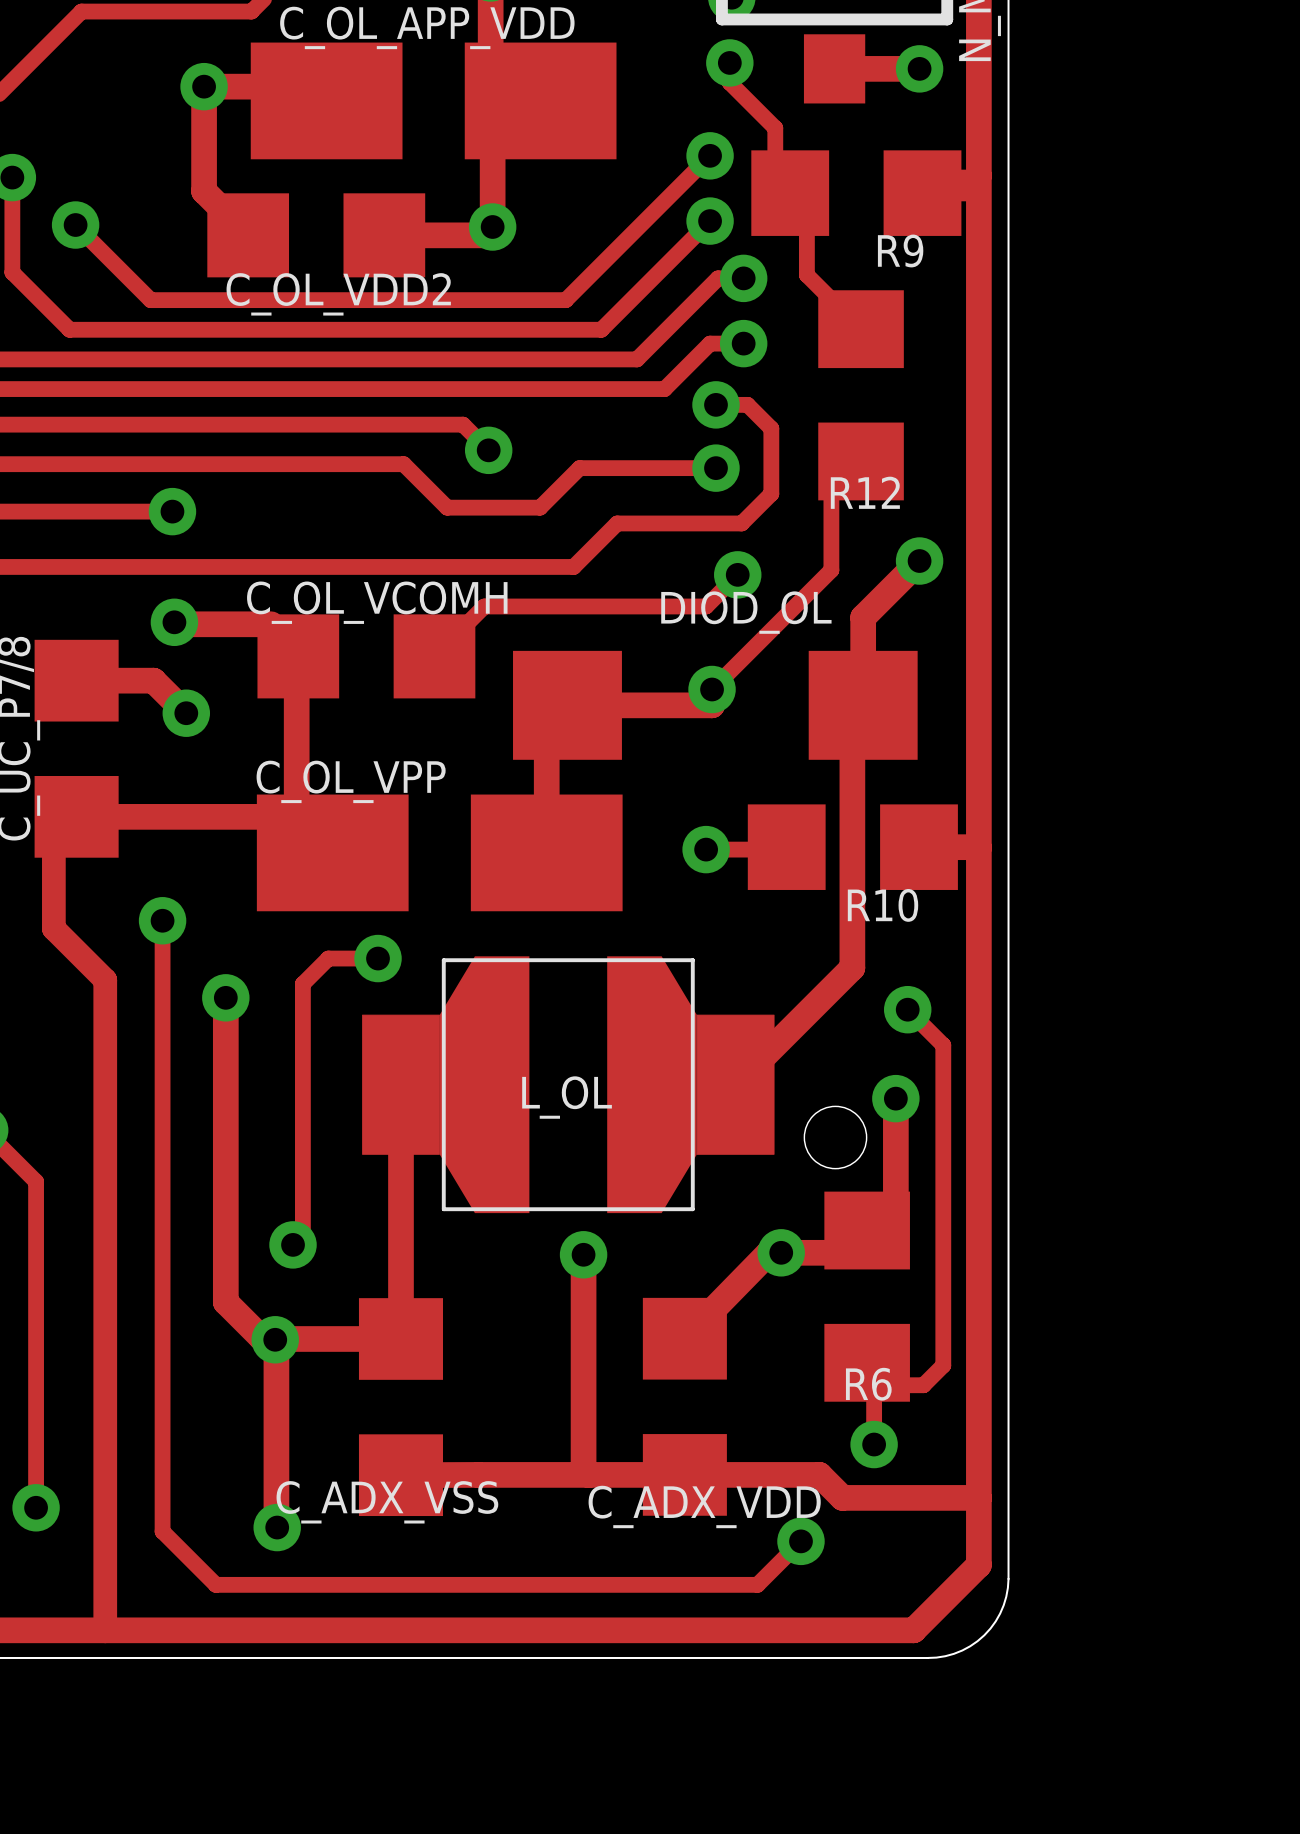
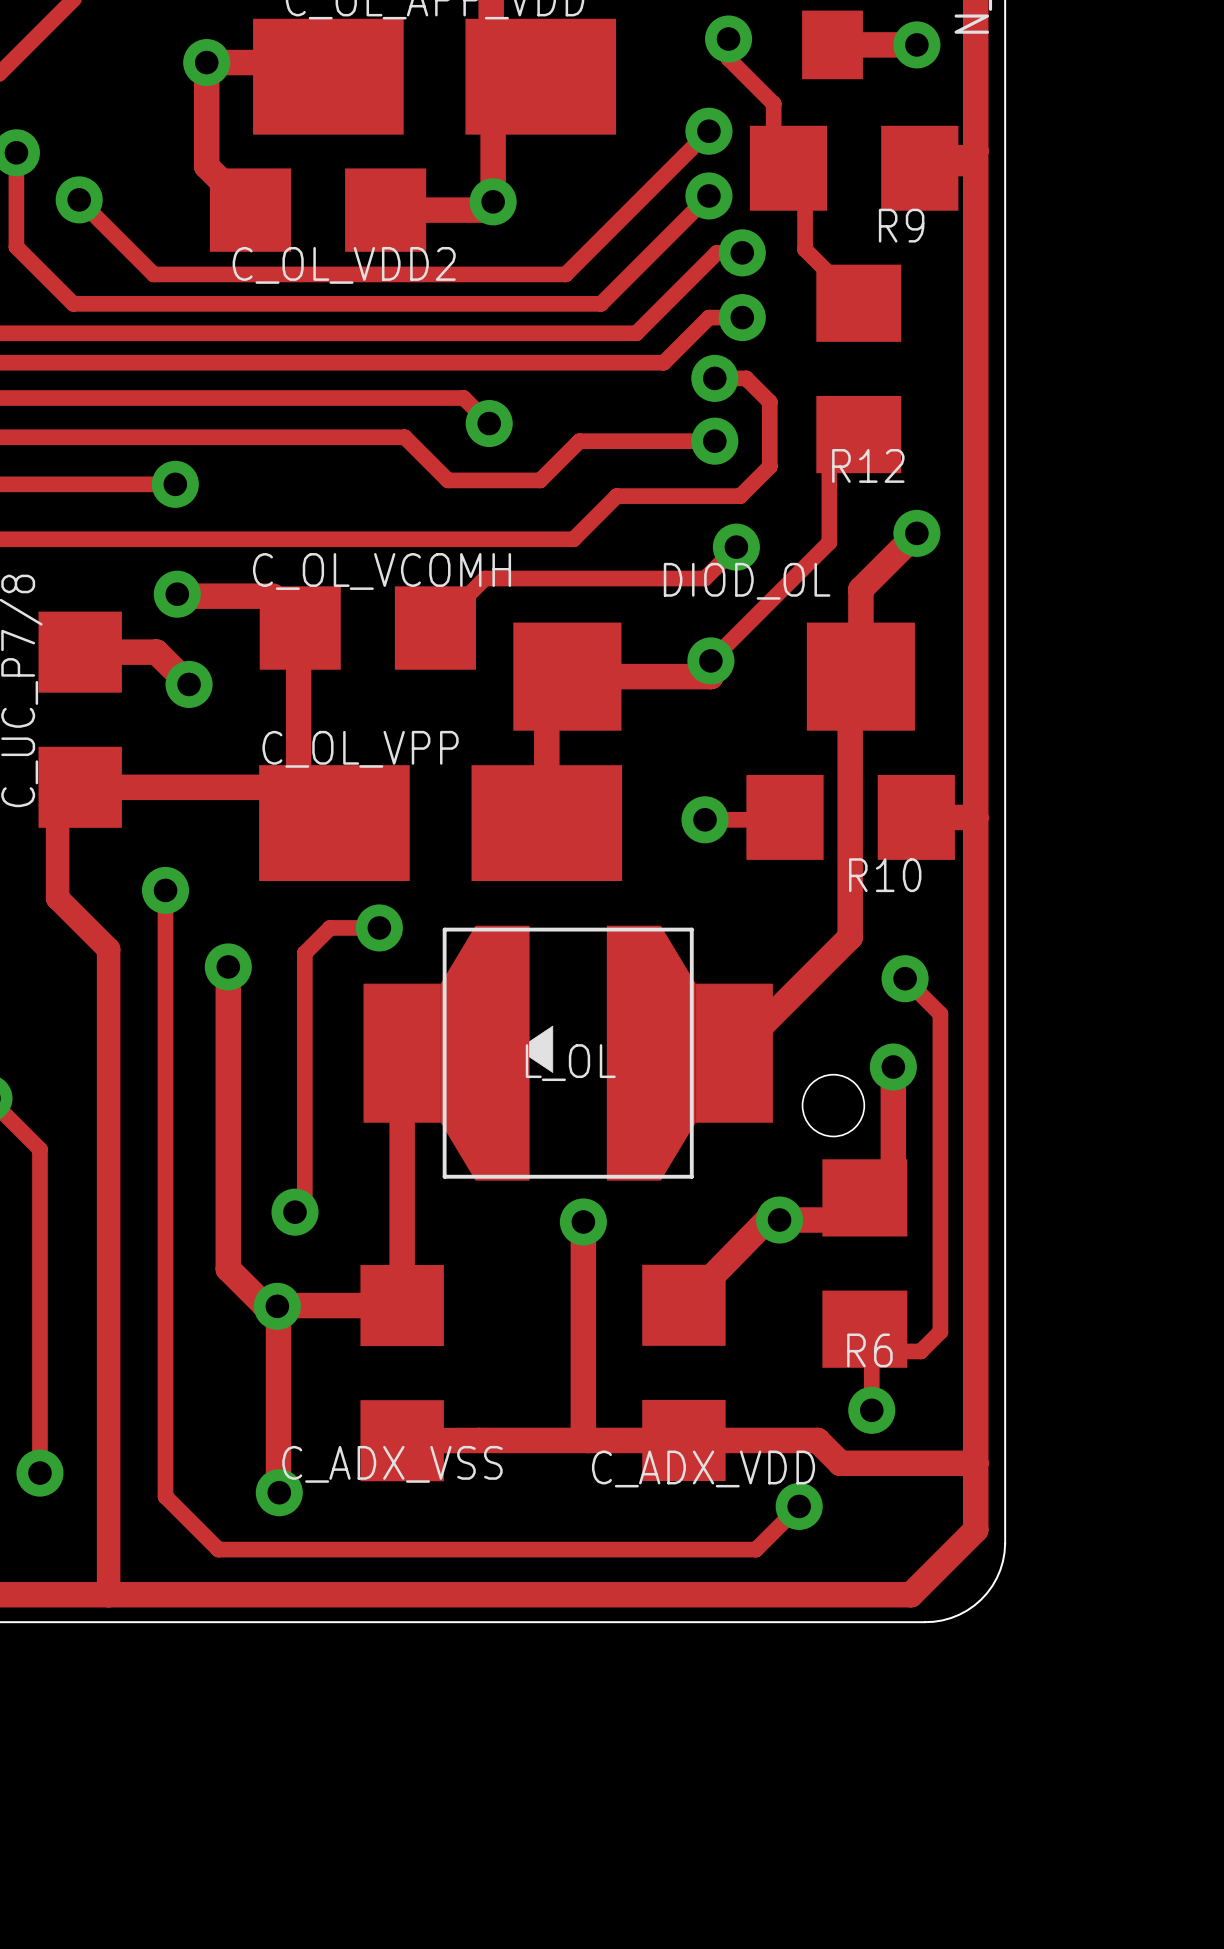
part footprint: [362, 956, 775, 1214] -> [363, 925, 773, 1181]

